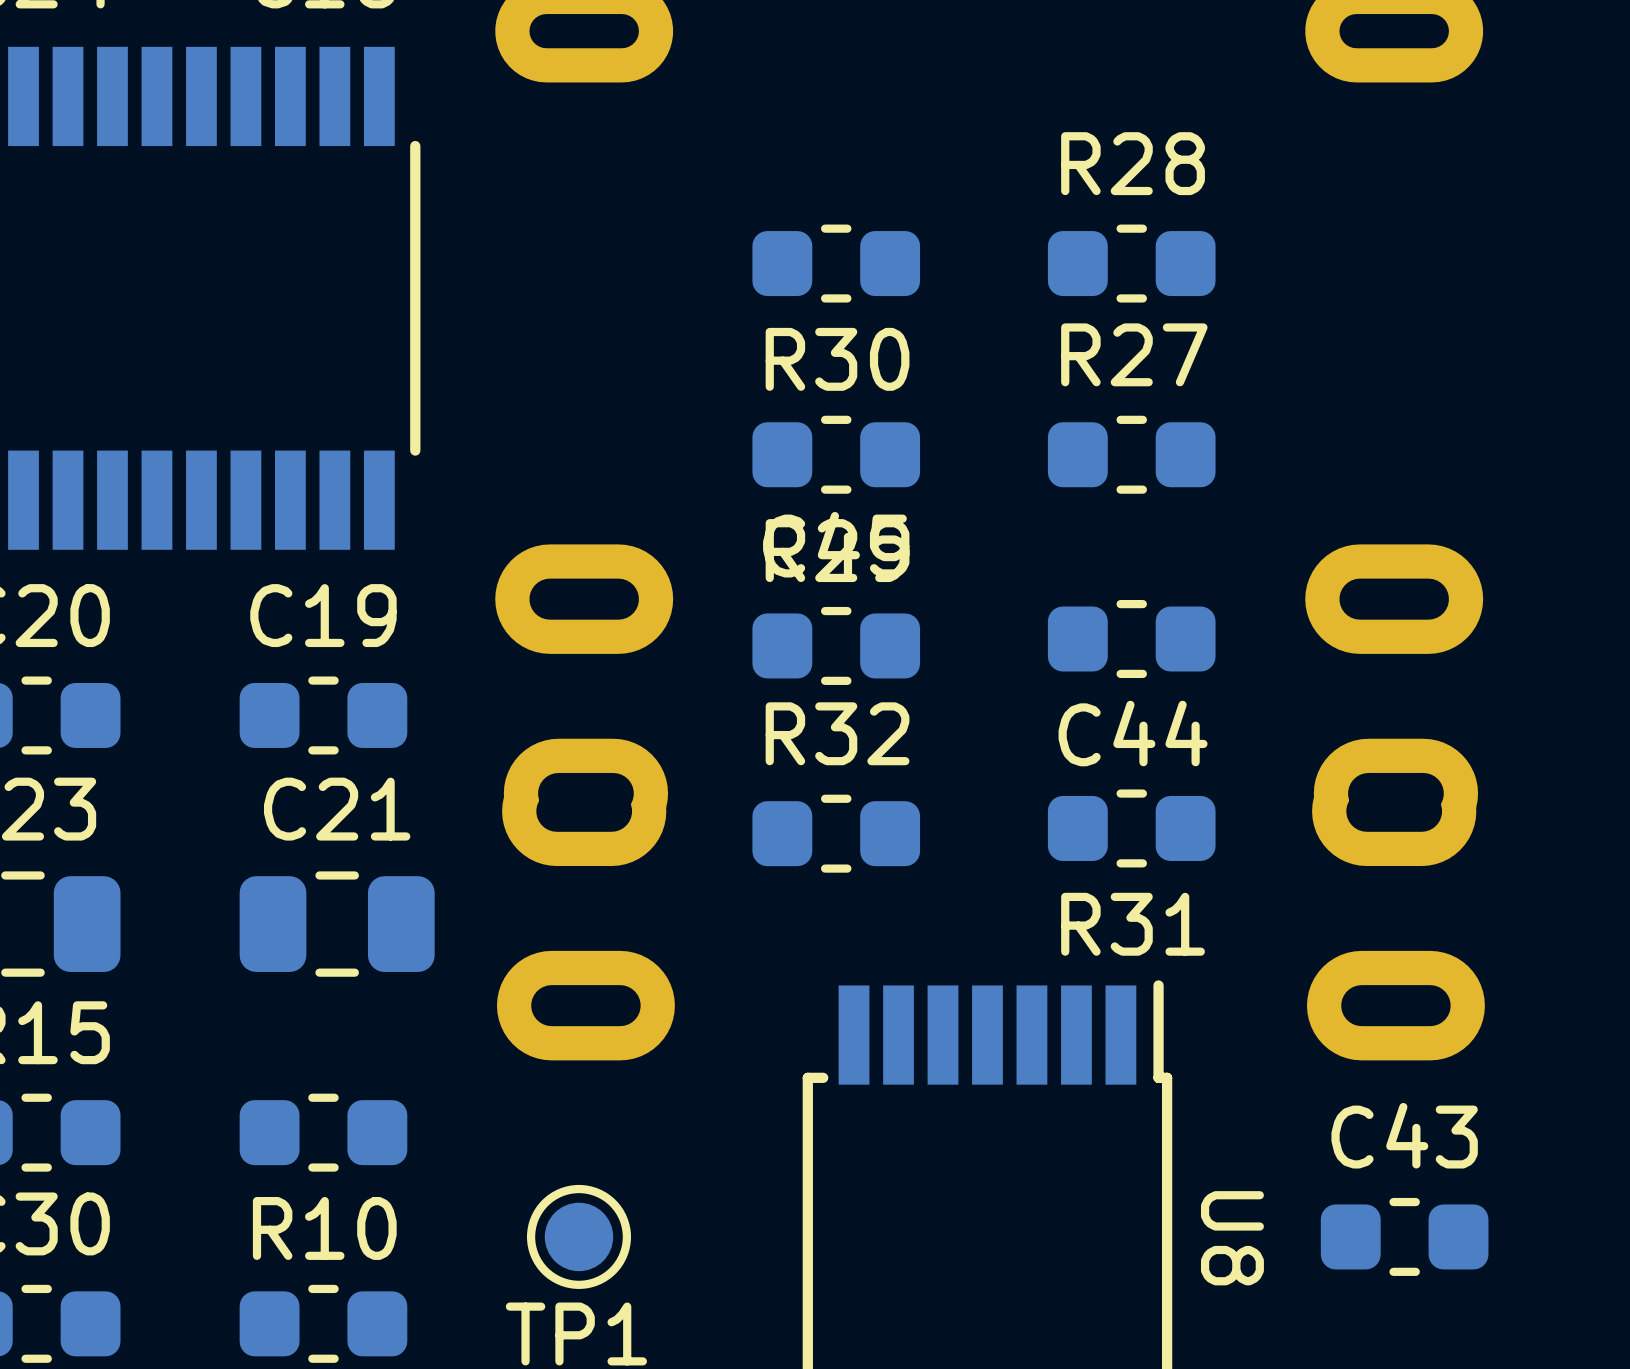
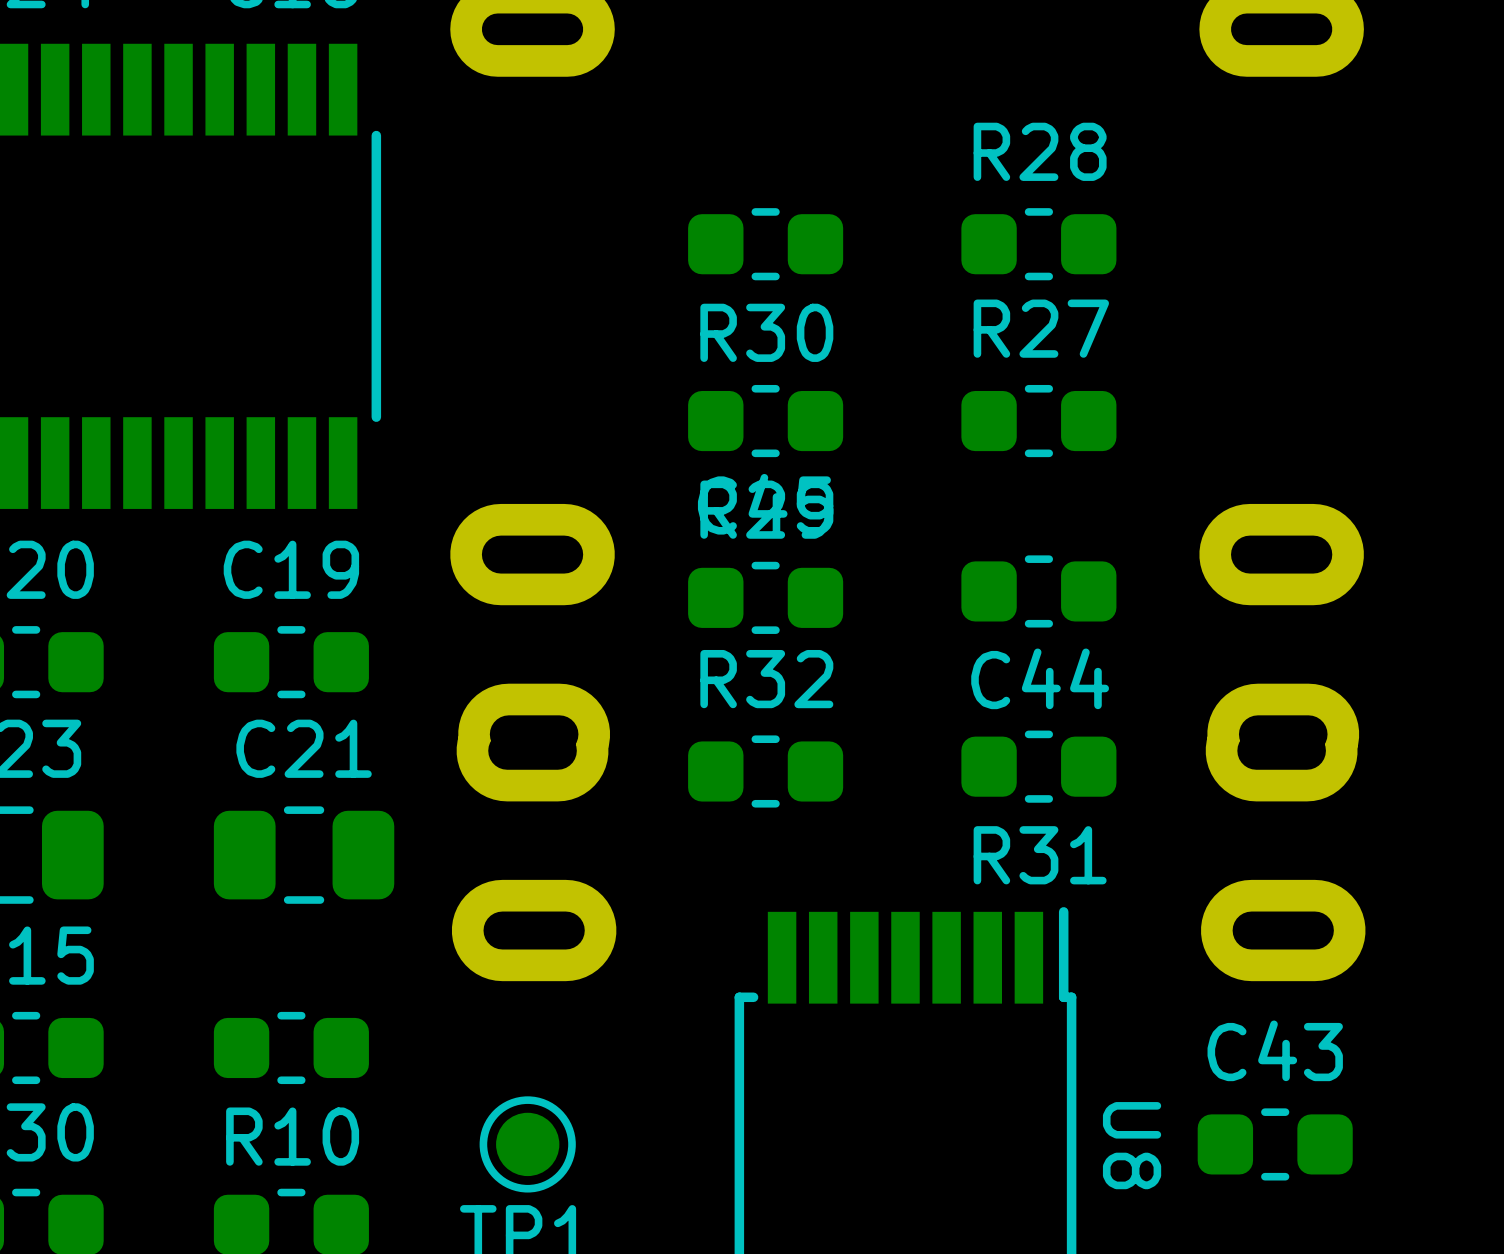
C43 position: (1404, 1236) -> (1275, 1144)

